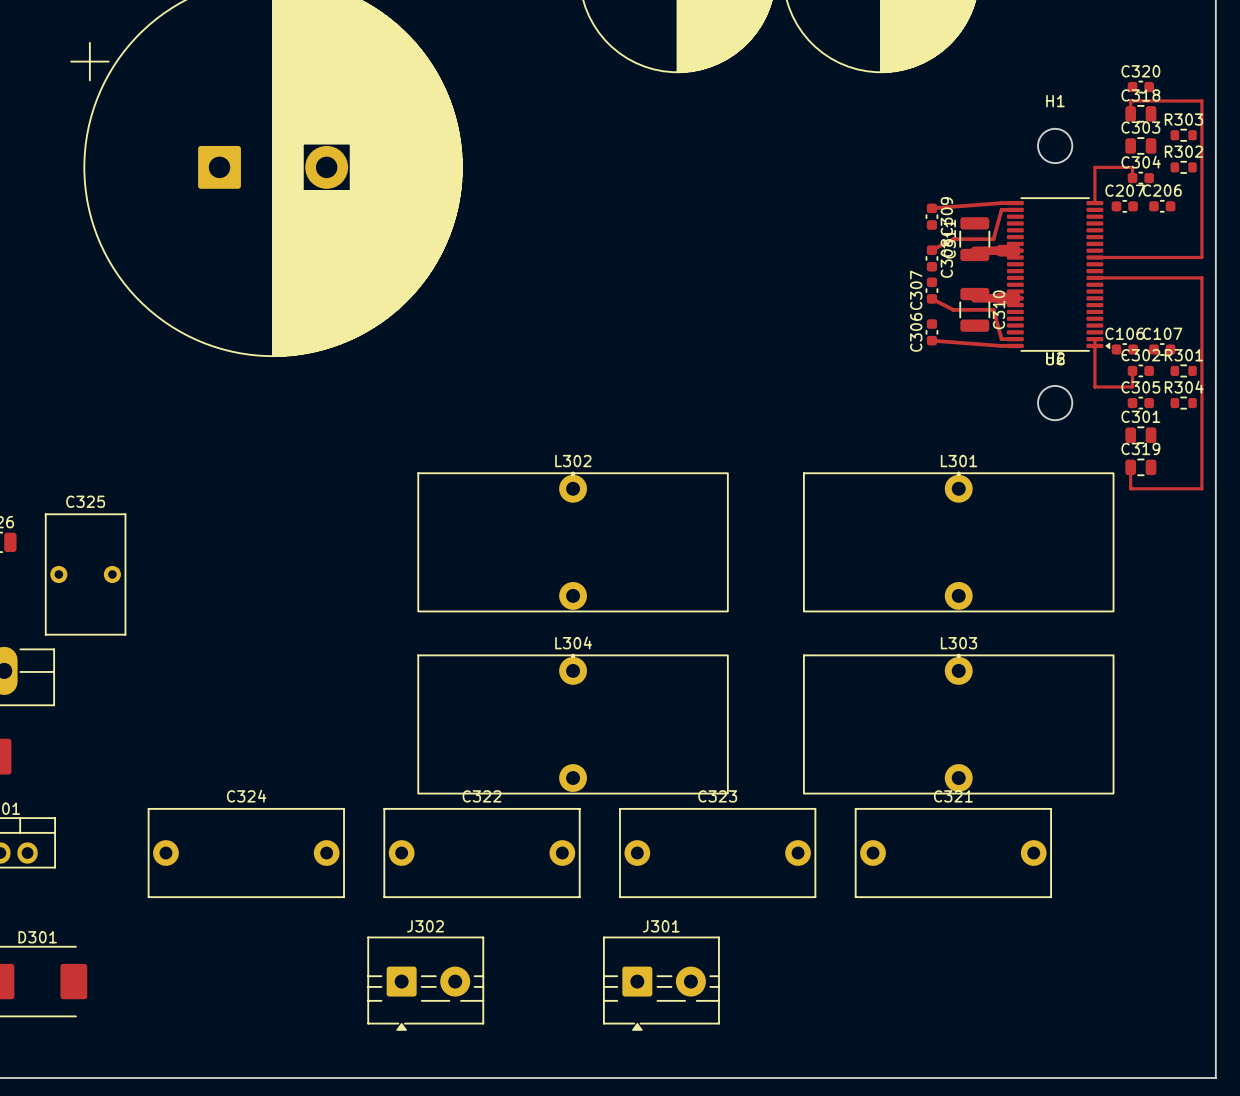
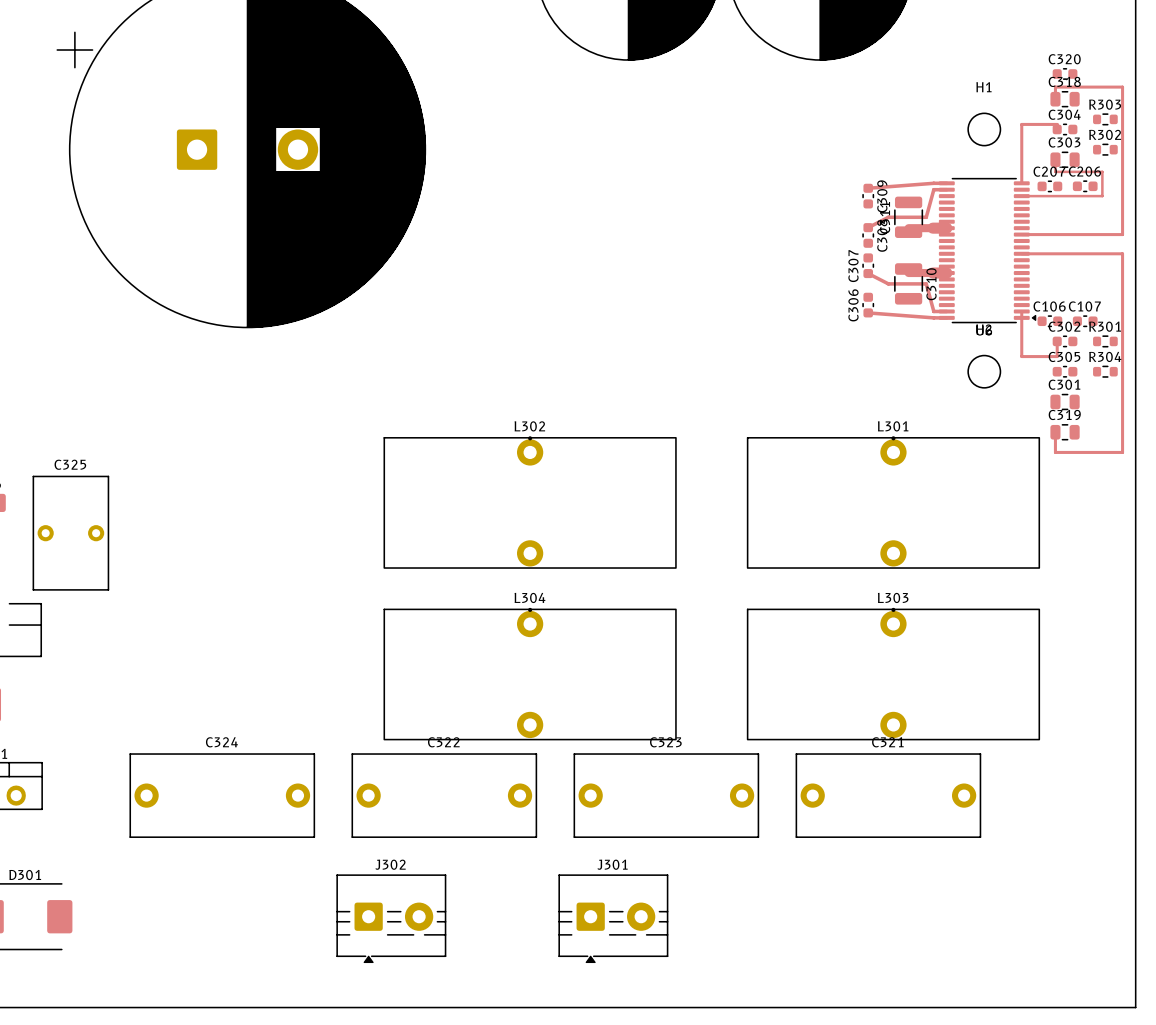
C303 position: (1140, 145) -> (1065, 159)
track: (1094, 167) (1132, 167) (1132, 178) -> (1021, 149) (1021, 124) (1057, 124) (1057, 129)
track: none -> (1055, 159) (1055, 171) (1102, 171) (1102, 196) (1021, 196)
C304 position: (1140, 178) -> (1065, 129)

